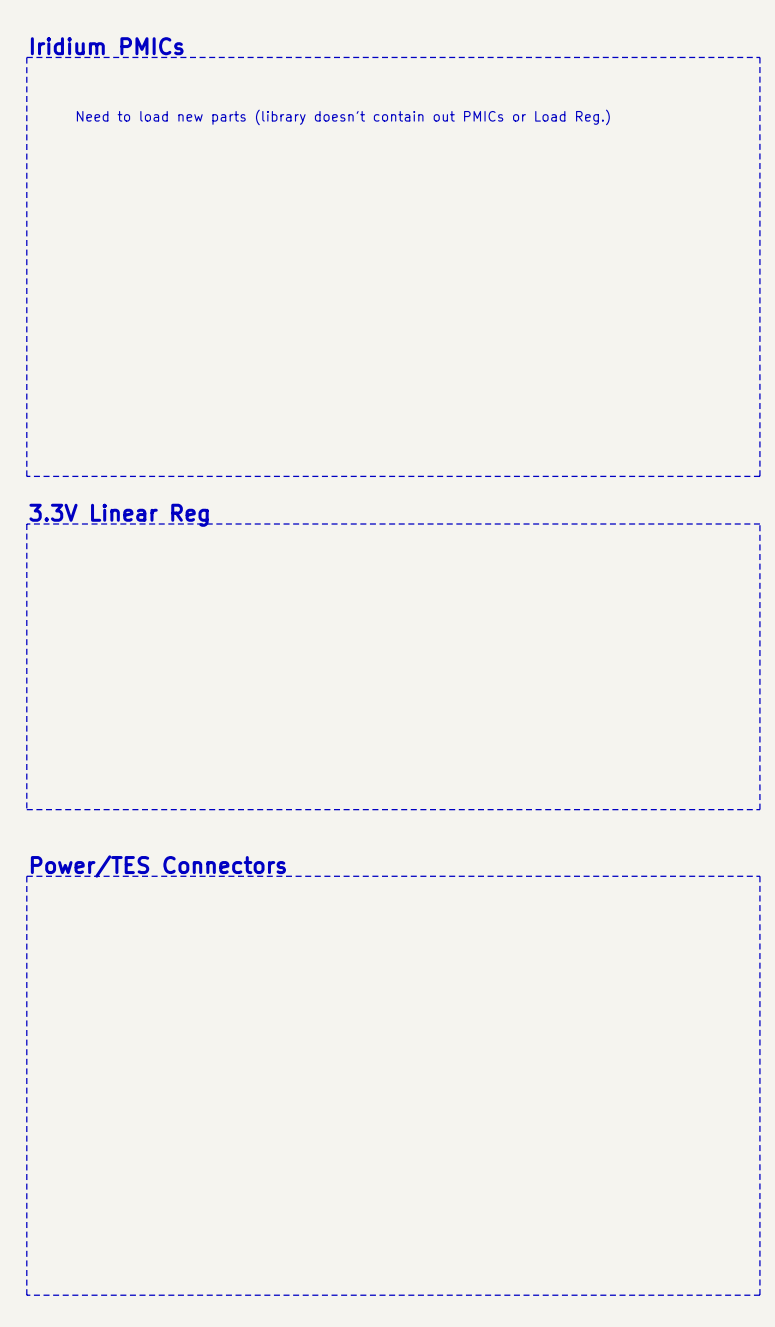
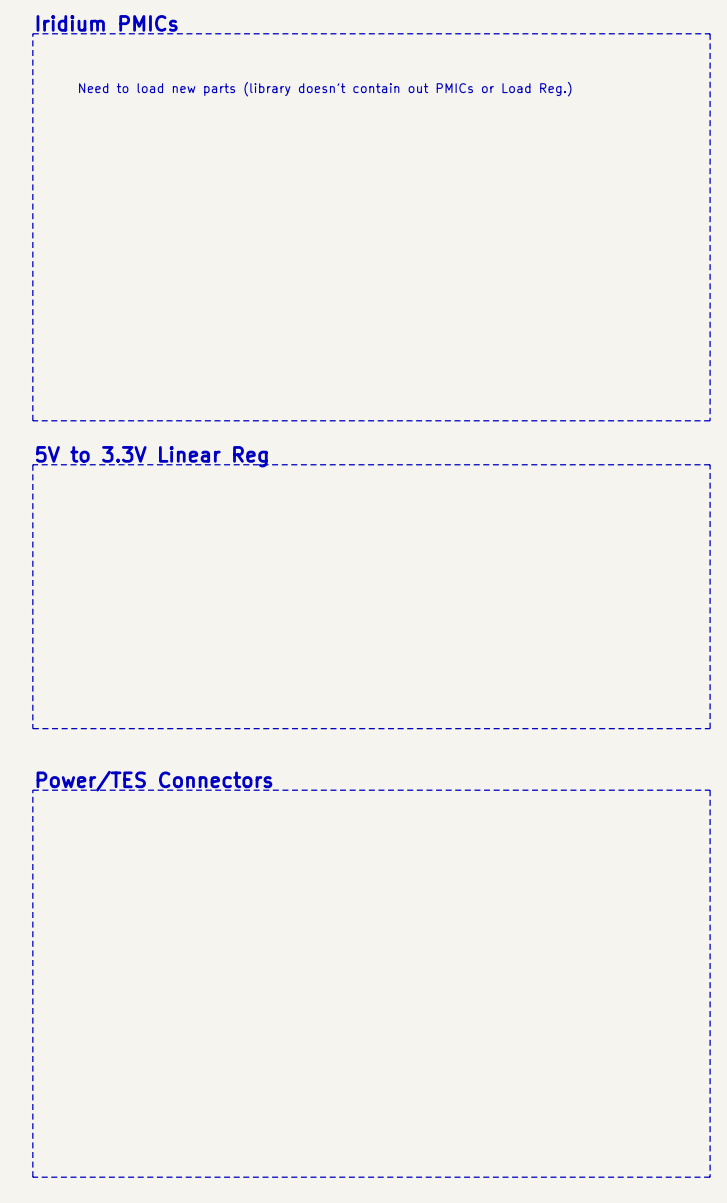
text: 3.3V Linear Reg (119, 515) -> 5V to 3.3V Linear Reg (151, 456)

